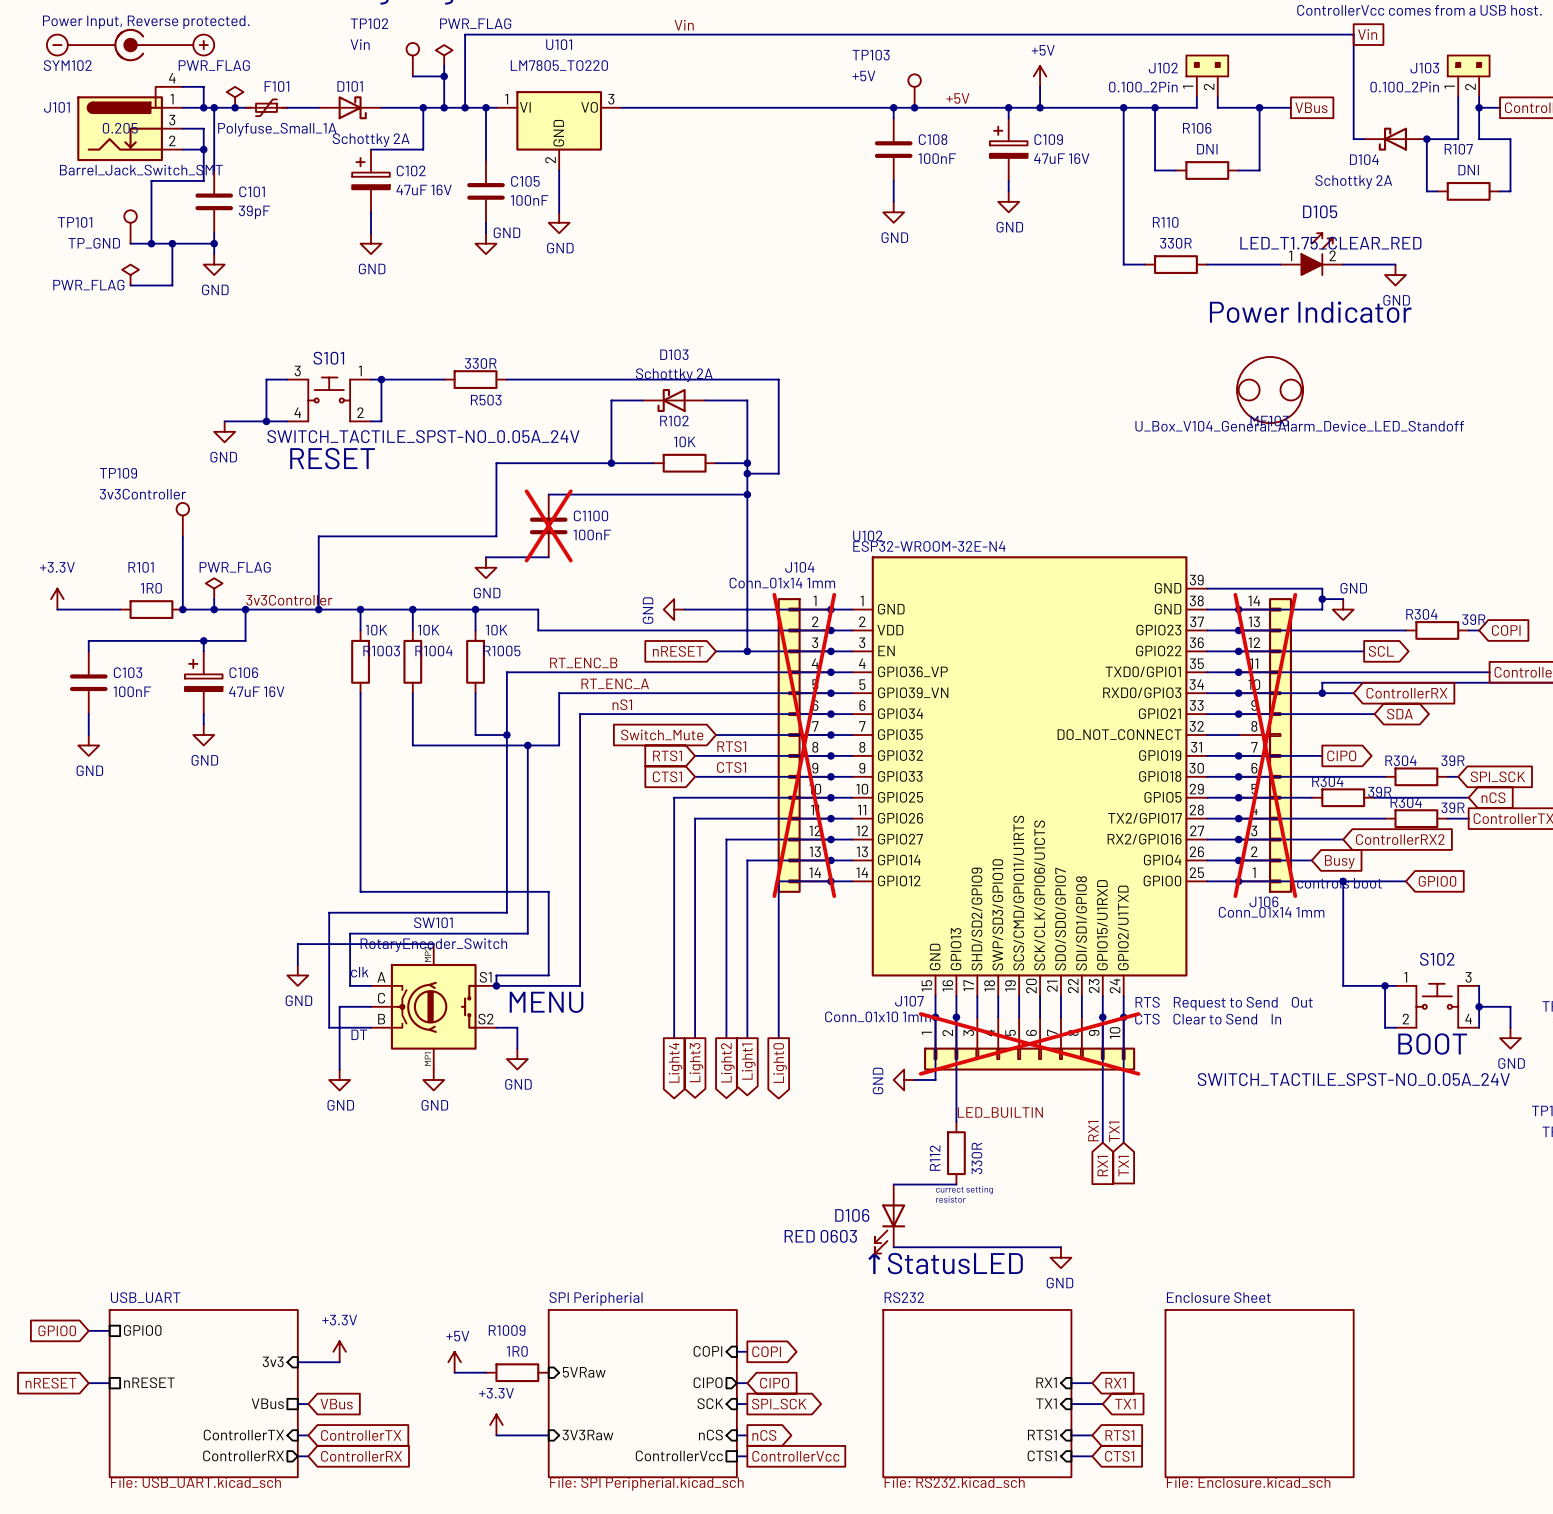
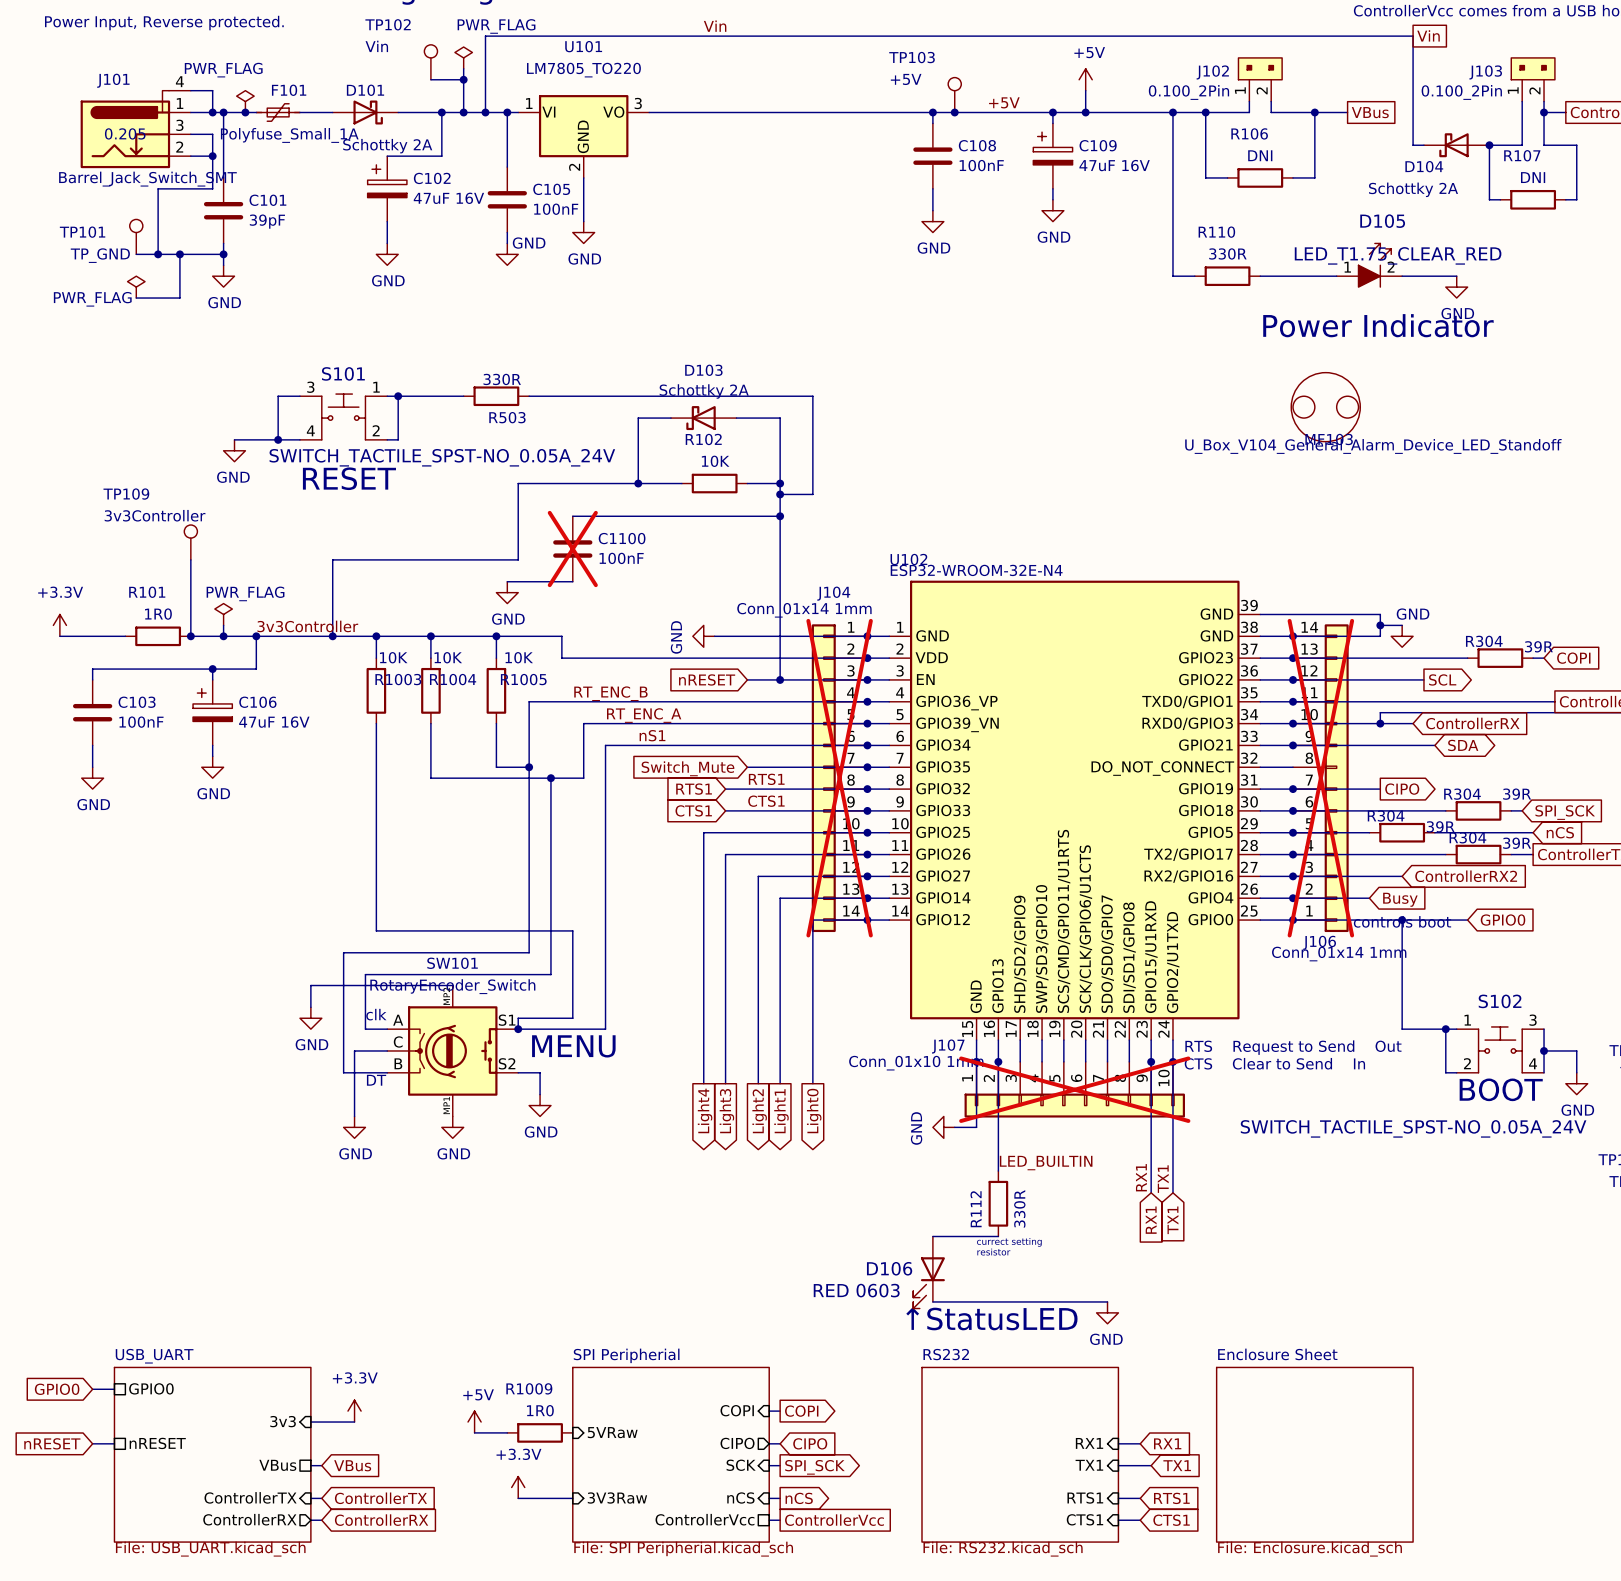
SYM102: (130, 45) -> none
J101 name position: J101 (56, 107) -> J101 (113, 80)

